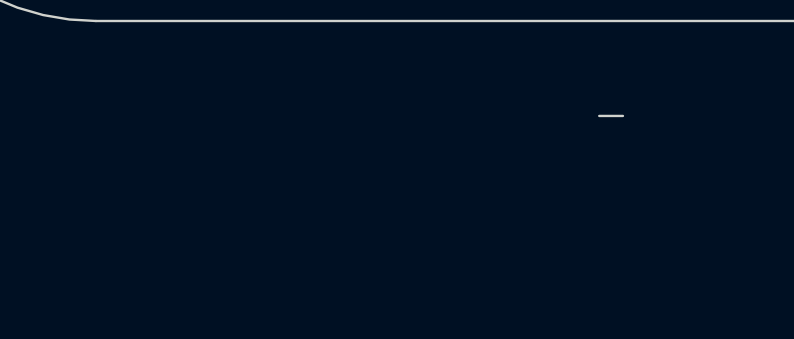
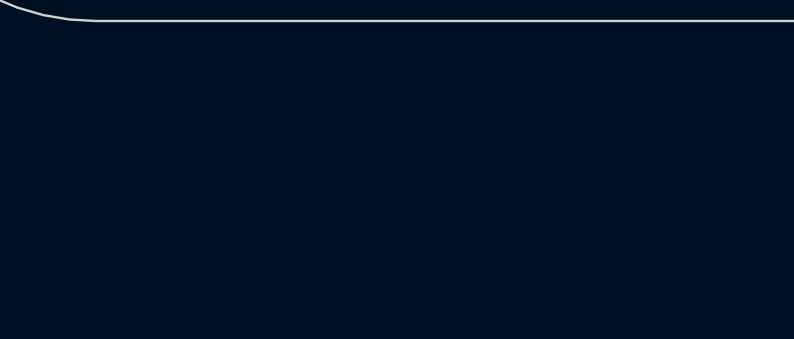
board edge: (599, 115) (622, 115) -> none

